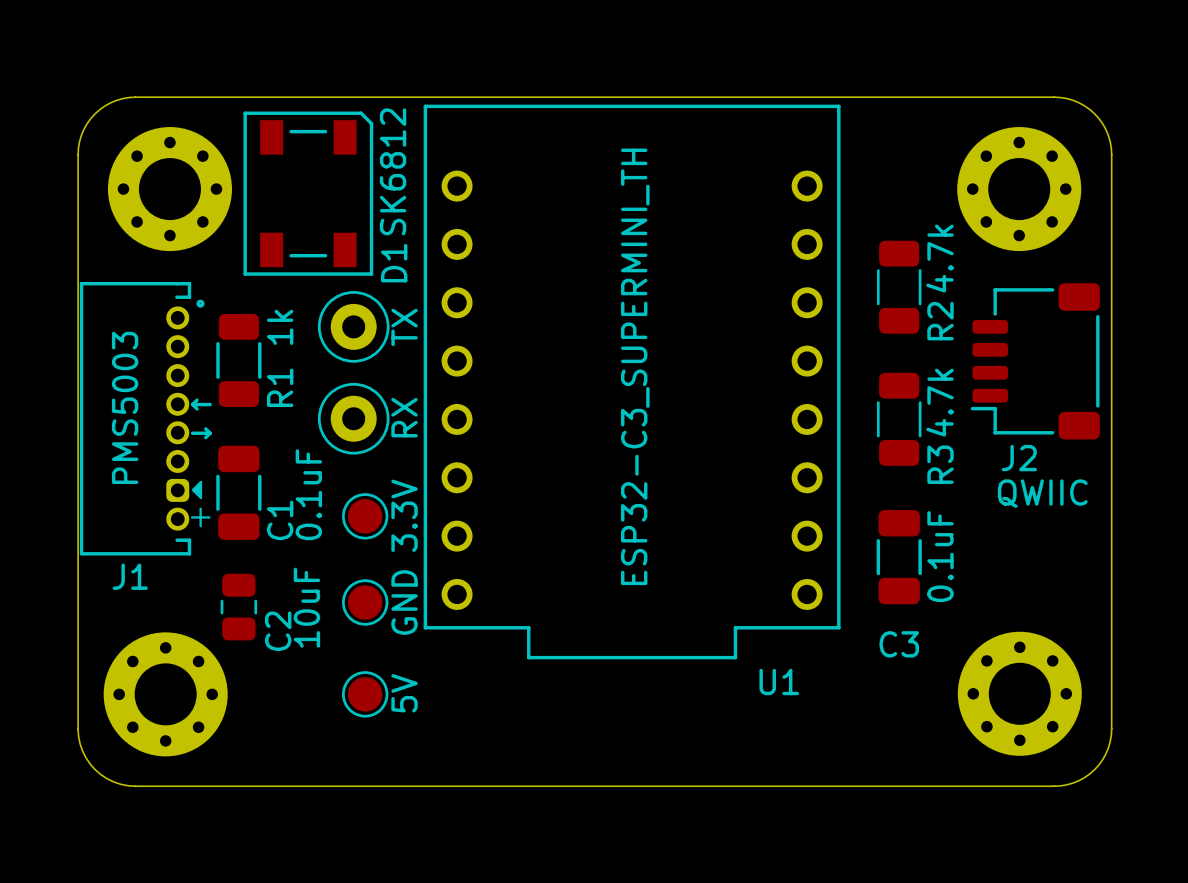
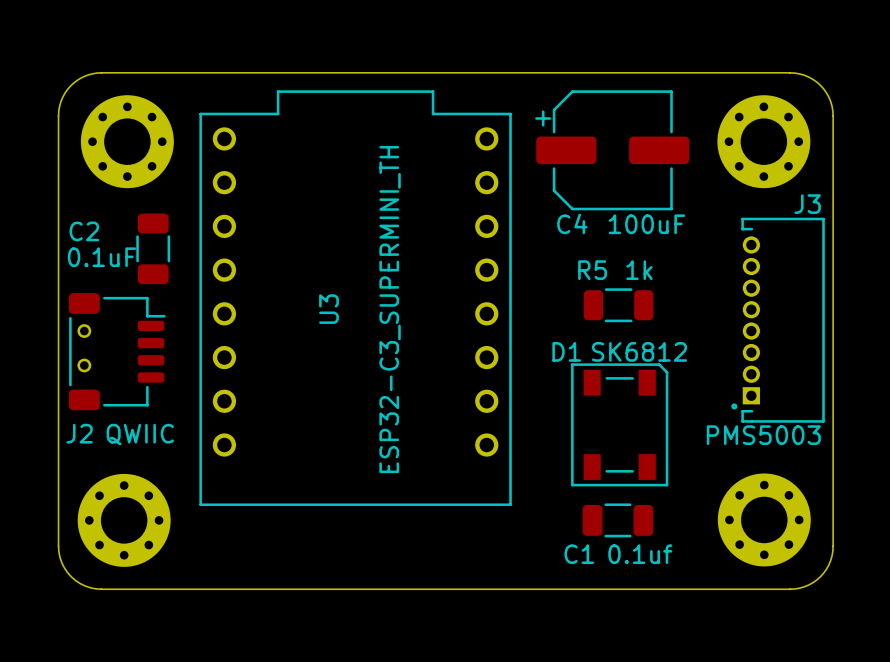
D1 value rotation: 0° (393, 171) -> 90° clockwise (639, 351)
D1 position: (308, 193) -> (619, 424)
C4: none -> 100uF (612, 150)
D1 name rotation: 0° (394, 263) -> 90° clockwise (566, 351)
D1 name position: D1 (394, 263) -> D1 (566, 351)
R2: 4.7k (899, 287) -> none
part: TX (353, 326) -> none
R1: 1k (238, 360) -> none
J2 rotation: 0° (1035, 361) -> 180° (117, 351)
J2 position: (1035, 361) -> (117, 351)
U1: ESP32-C3_SUPERMINI_TH (632, 382) -> none
U3: none -> ESP32-C3_SUPERMINI_TH (355, 298)
text: ← (201, 404) -> none
R5: none -> 1k (618, 305)
J1: PMS5003 (142, 418) -> none
part: RX (353, 418) -> none
R3: 4.7k (899, 419) -> none
J3: none -> PMS5003 (778, 320)
text: → (201, 433) -> none
part: none -> (84, 331)
drawing: [191, 480, 203, 500] -> none
part: none -> (84, 365)
C1 rotation: 0° (238, 492) -> 90° clockwise (617, 520)
C1 position: (238, 492) -> (617, 520)
C1 value: 0.1uF (308, 494) -> 0.1uf (640, 554)
part: 3.3V (365, 516) -> none
text: + (200, 517) -> none
C3: 0.1uF (899, 557) -> none
C2 footprint: [220, 573, 258, 641] -> [136, 213, 171, 285]
part: GND (365, 602) -> none
C2 value: 10uF (306, 607) -> 0.1uF (101, 257)
C2 name position: C2 (278, 631) -> C2 (84, 231)
part: 5V (365, 694) -> none

